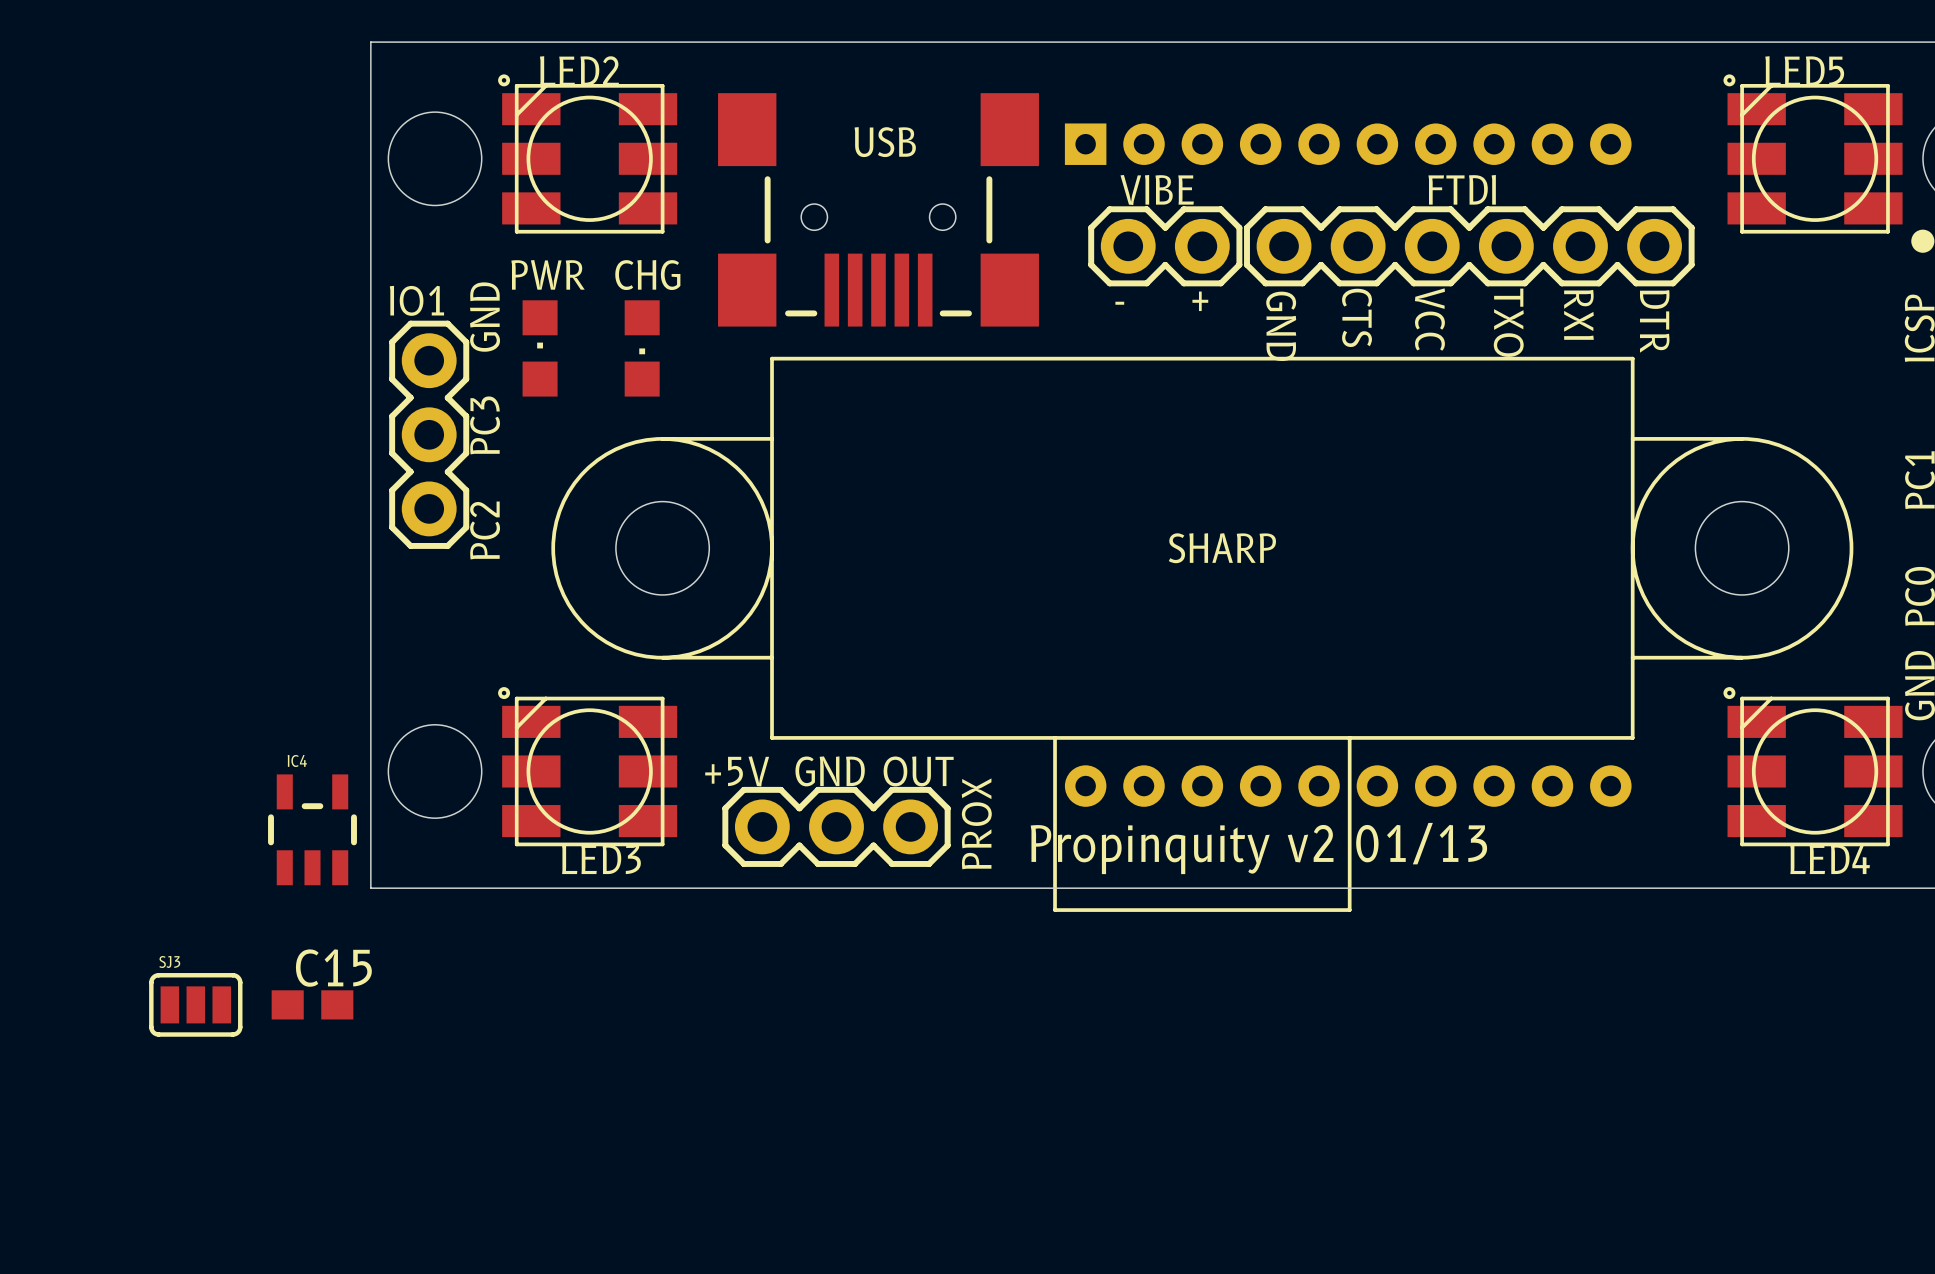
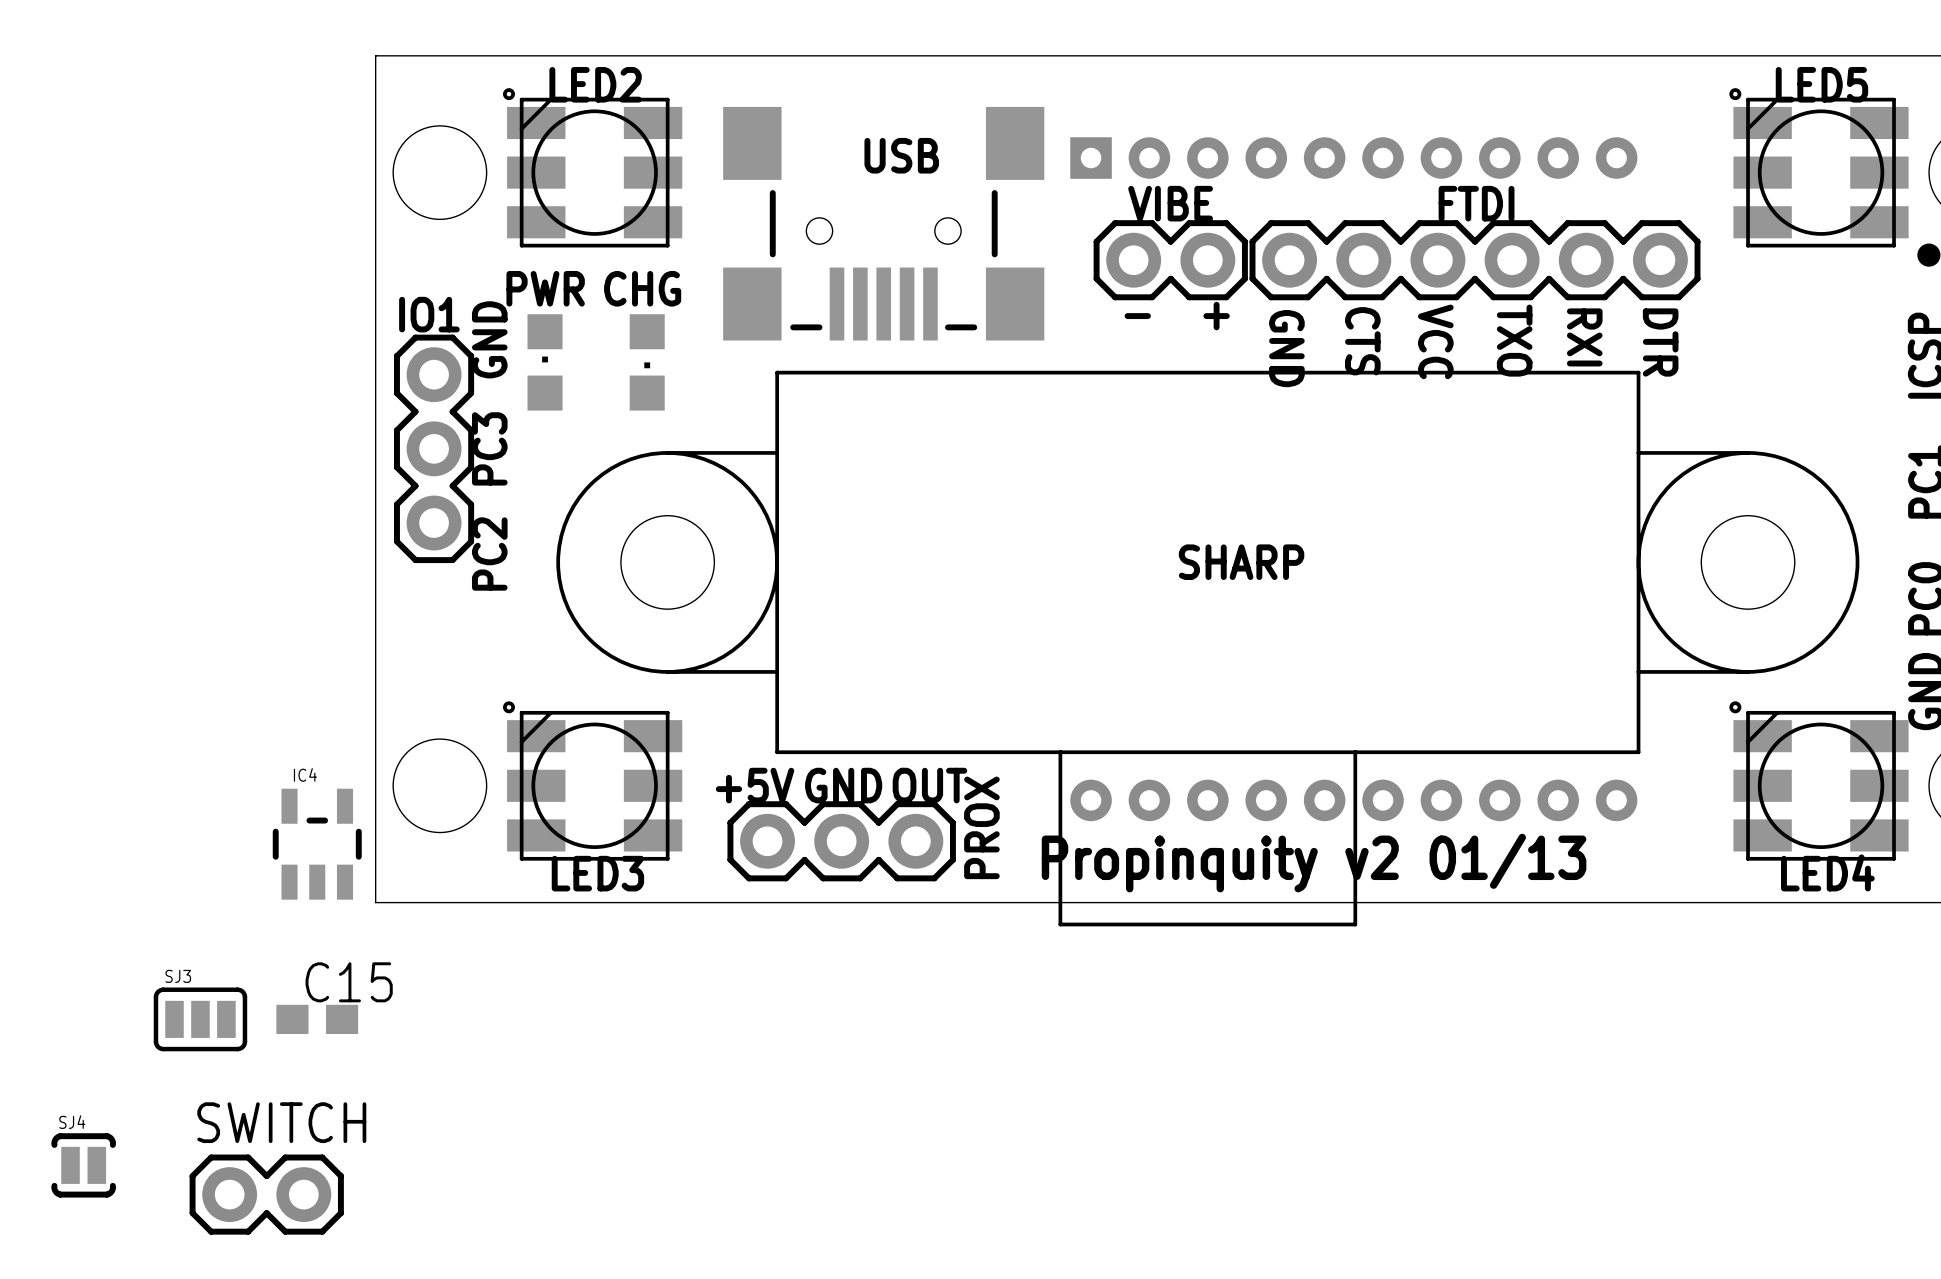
SJ4: none -> (83, 1165)
SWITCH: none -> (266, 1194)

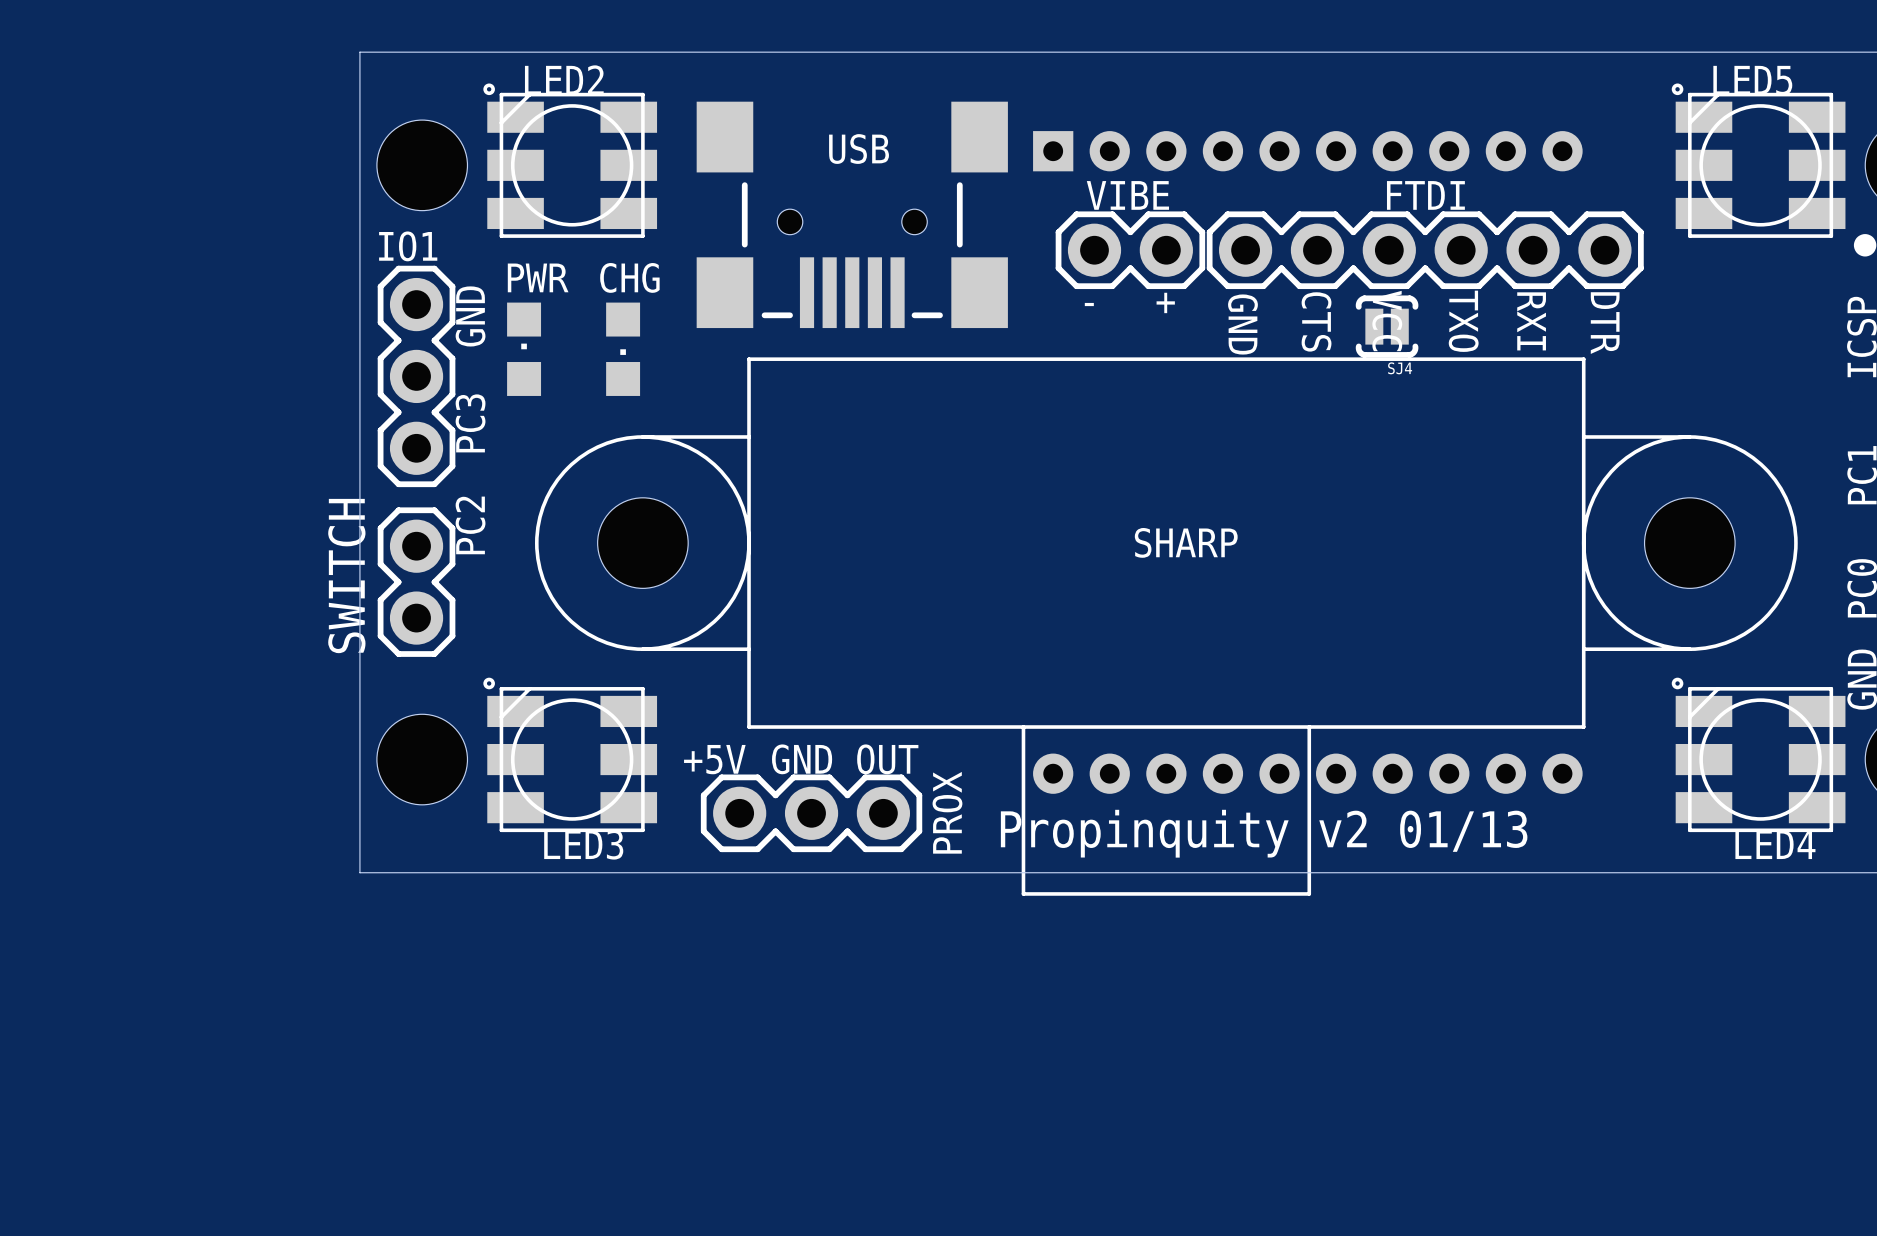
IO1 position: (434, 448) -> (416, 376)
IC4: (317, 844) -> none
SJ3: (200, 1019) -> none
C15: (317, 1019) -> none
SJ4 name position: SJ4 (72, 1122) -> SJ4 (1400, 368)
SWITCH name position: SWITCH (281, 1122) -> SWITCH (346, 576)
SJ4 position: (83, 1165) -> (1387, 326)
SWITCH rotation: 0° (266, 1194) -> 90° clockwise (416, 582)
SWITCH position: (266, 1194) -> (416, 582)

